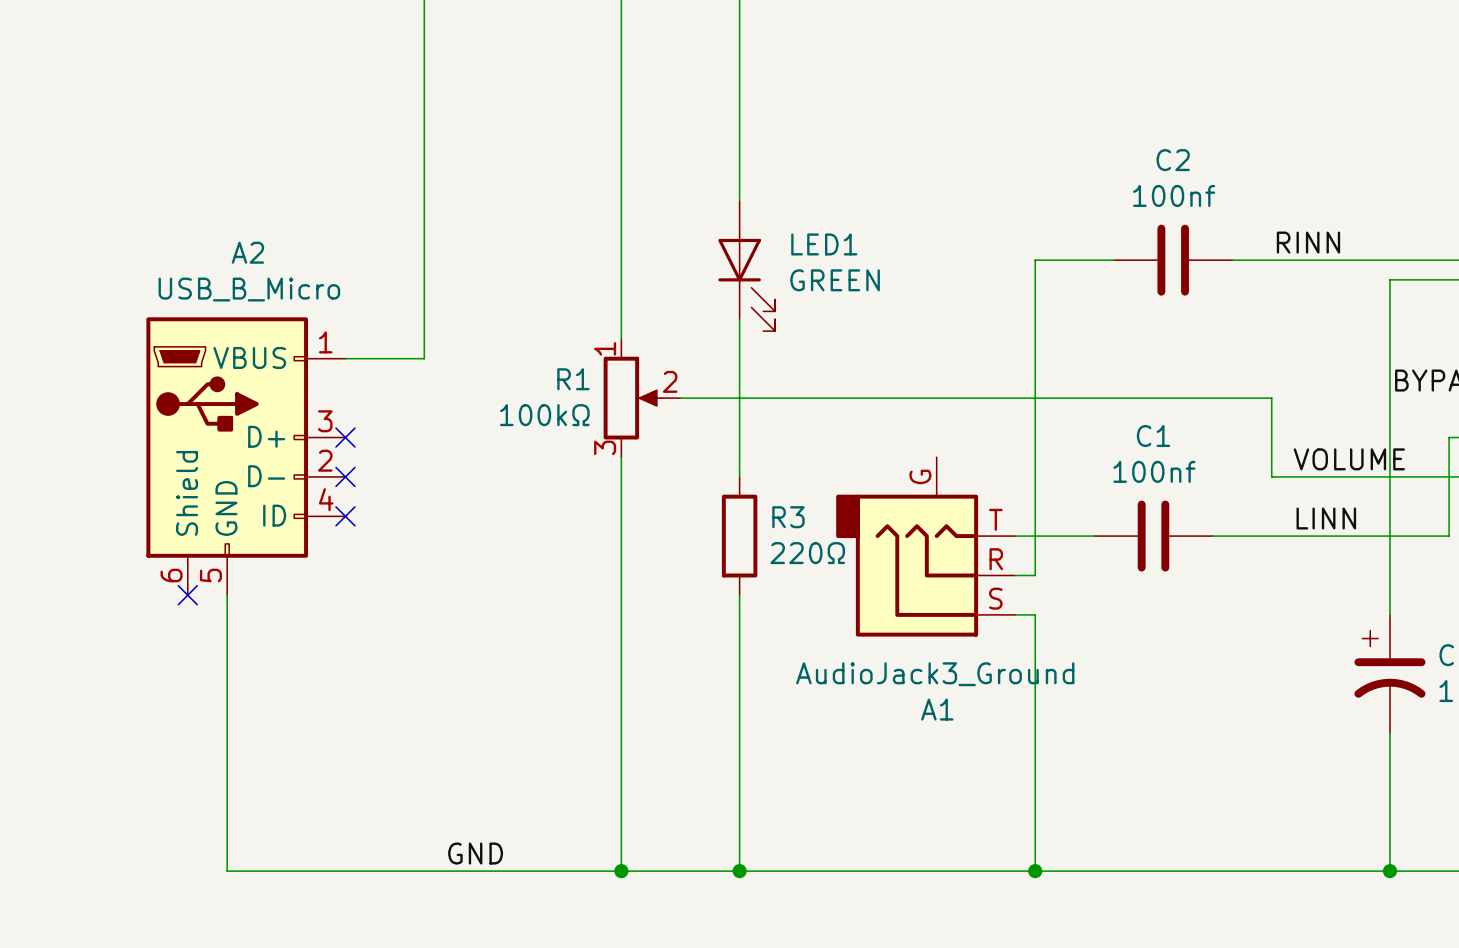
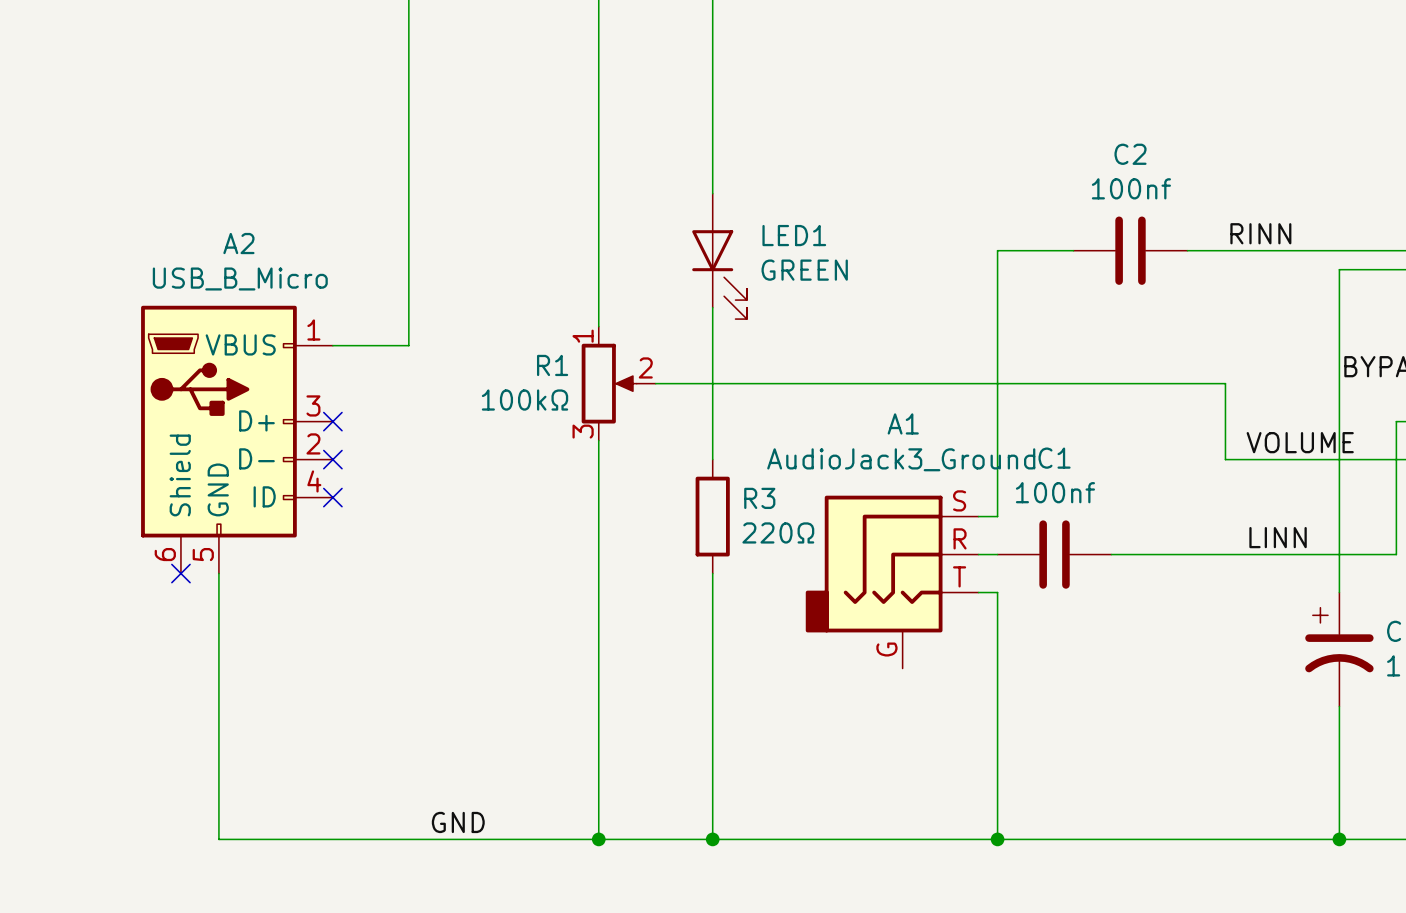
label position: LINN (1326, 518) -> LINN (1278, 537)
wire: (1094, 536) (1035, 536) (1035, 575) -> none
C1 position: (1153, 536) -> (1054, 554)
wire: (1212, 536) (1449, 536) -> (1111, 554) (1396, 554) (1396, 516)
A1 flip: as is (907, 565) -> up-down (874, 564)

